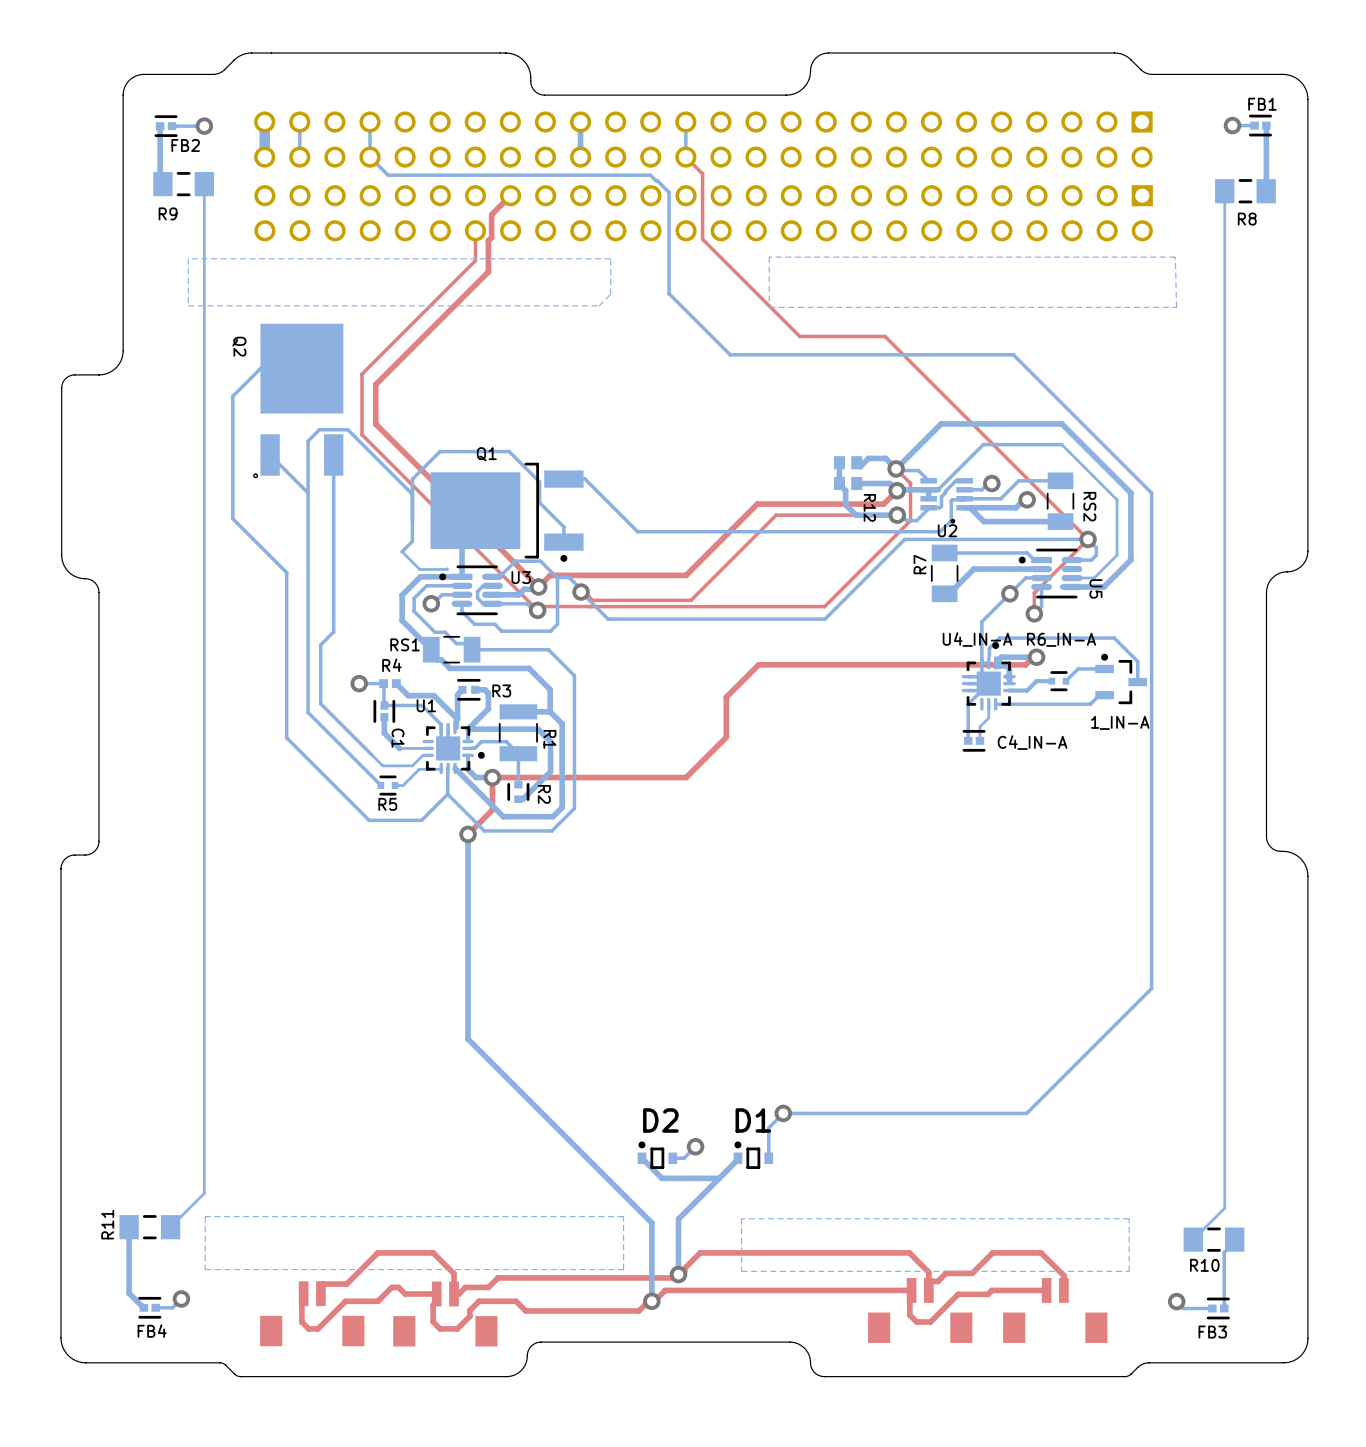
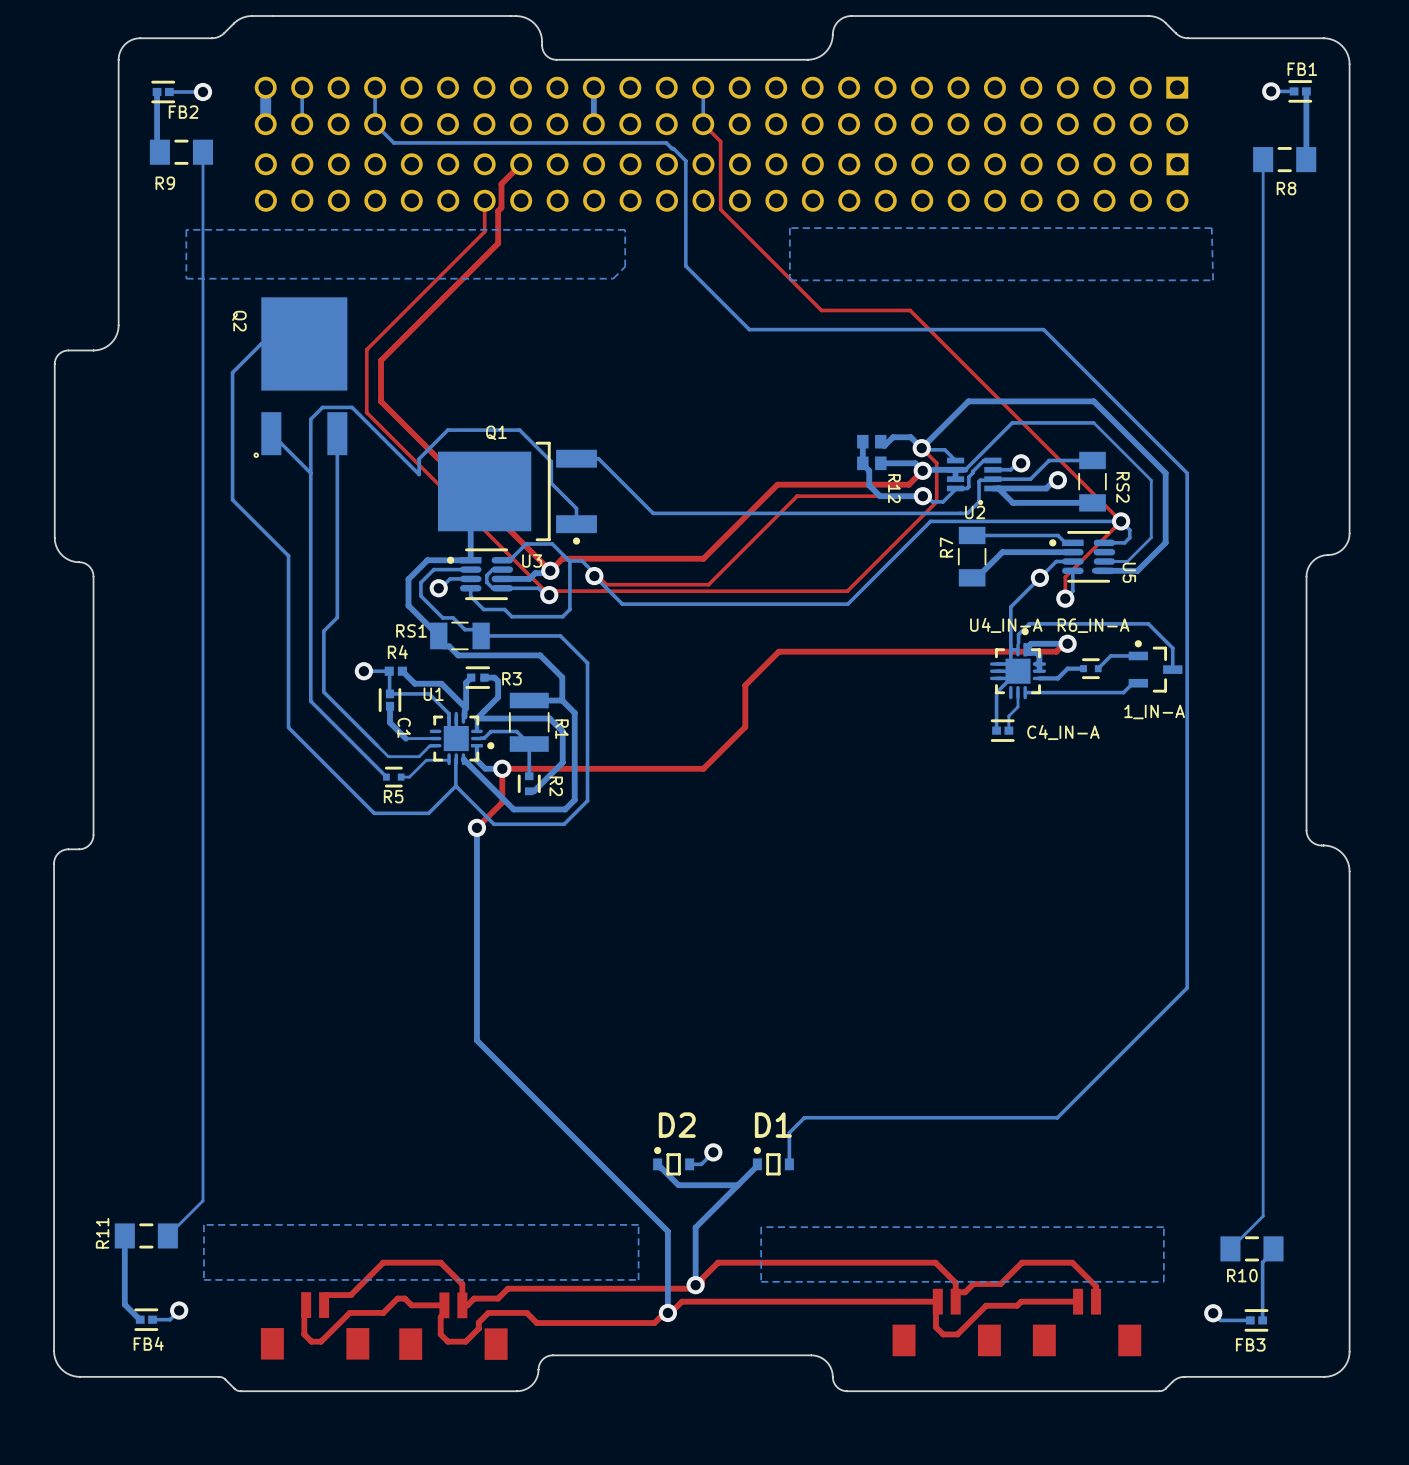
bottom track: (412, 494) (412, 541) (402, 551) (419, 569) (447, 569) -> none
via: (783, 1113) -> none

